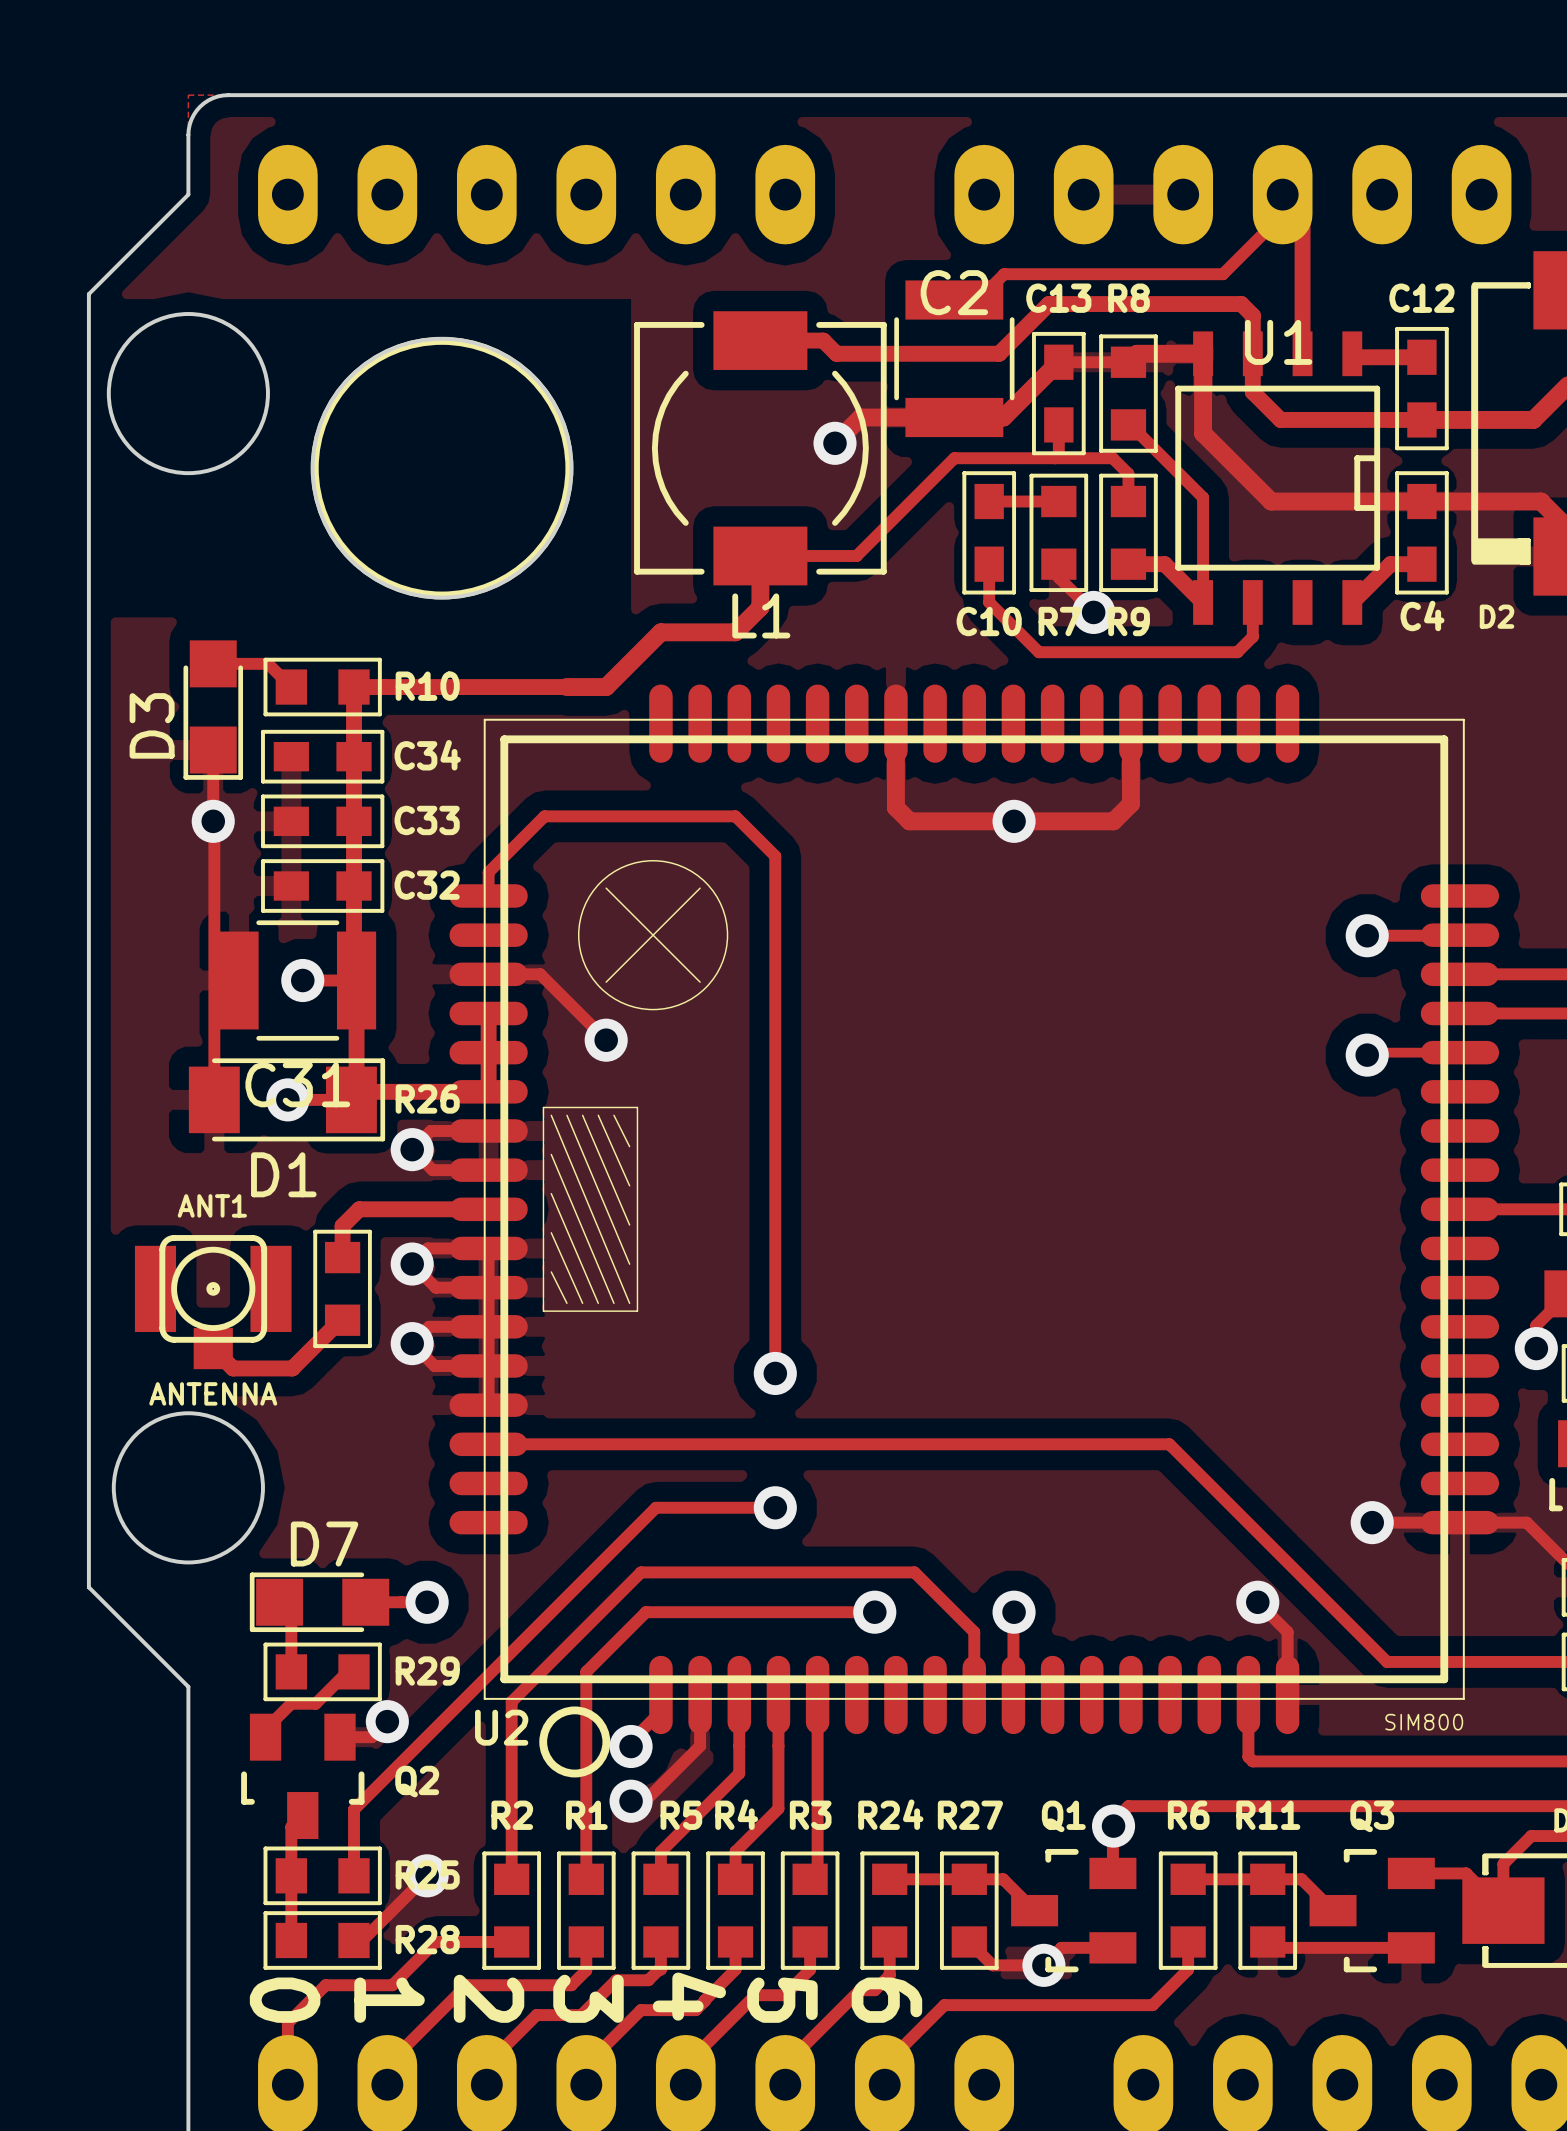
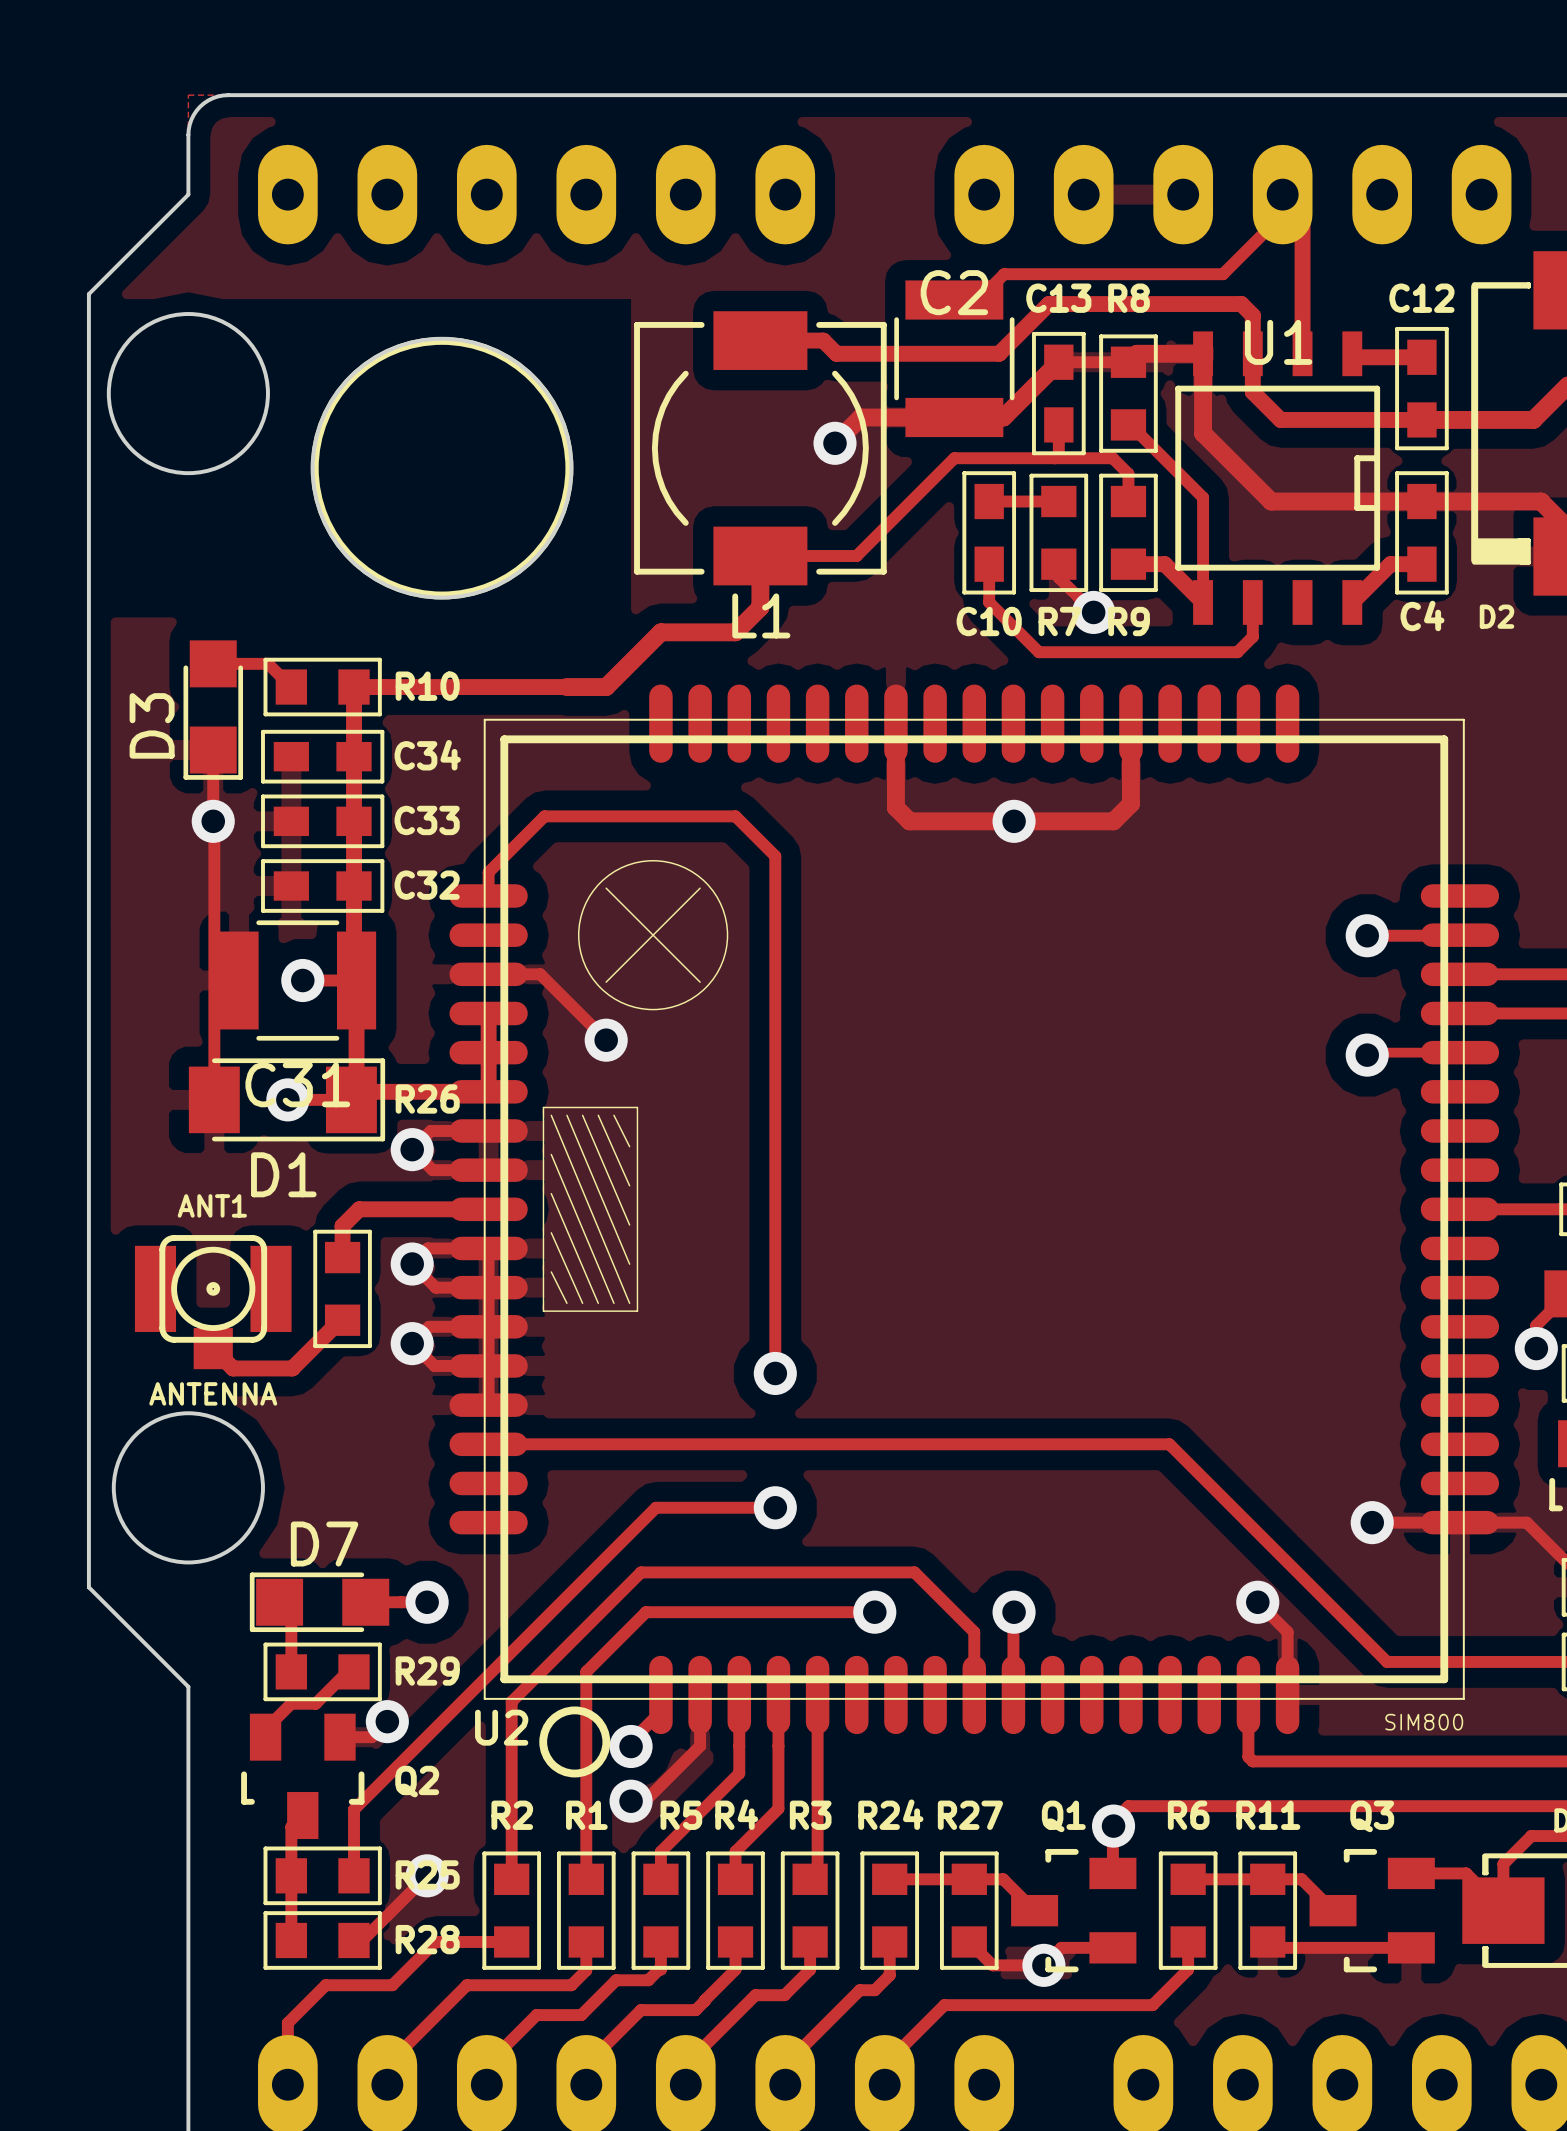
text: 4 (689, 1996) -> none
text: 2 (489, 1998) -> none
text: 3 (588, 1998) -> none
text: 0 (285, 2000) -> none
text: 1 (389, 2000) -> none
text: 5 (782, 2000) -> none
text: 6 (886, 2000) -> none

